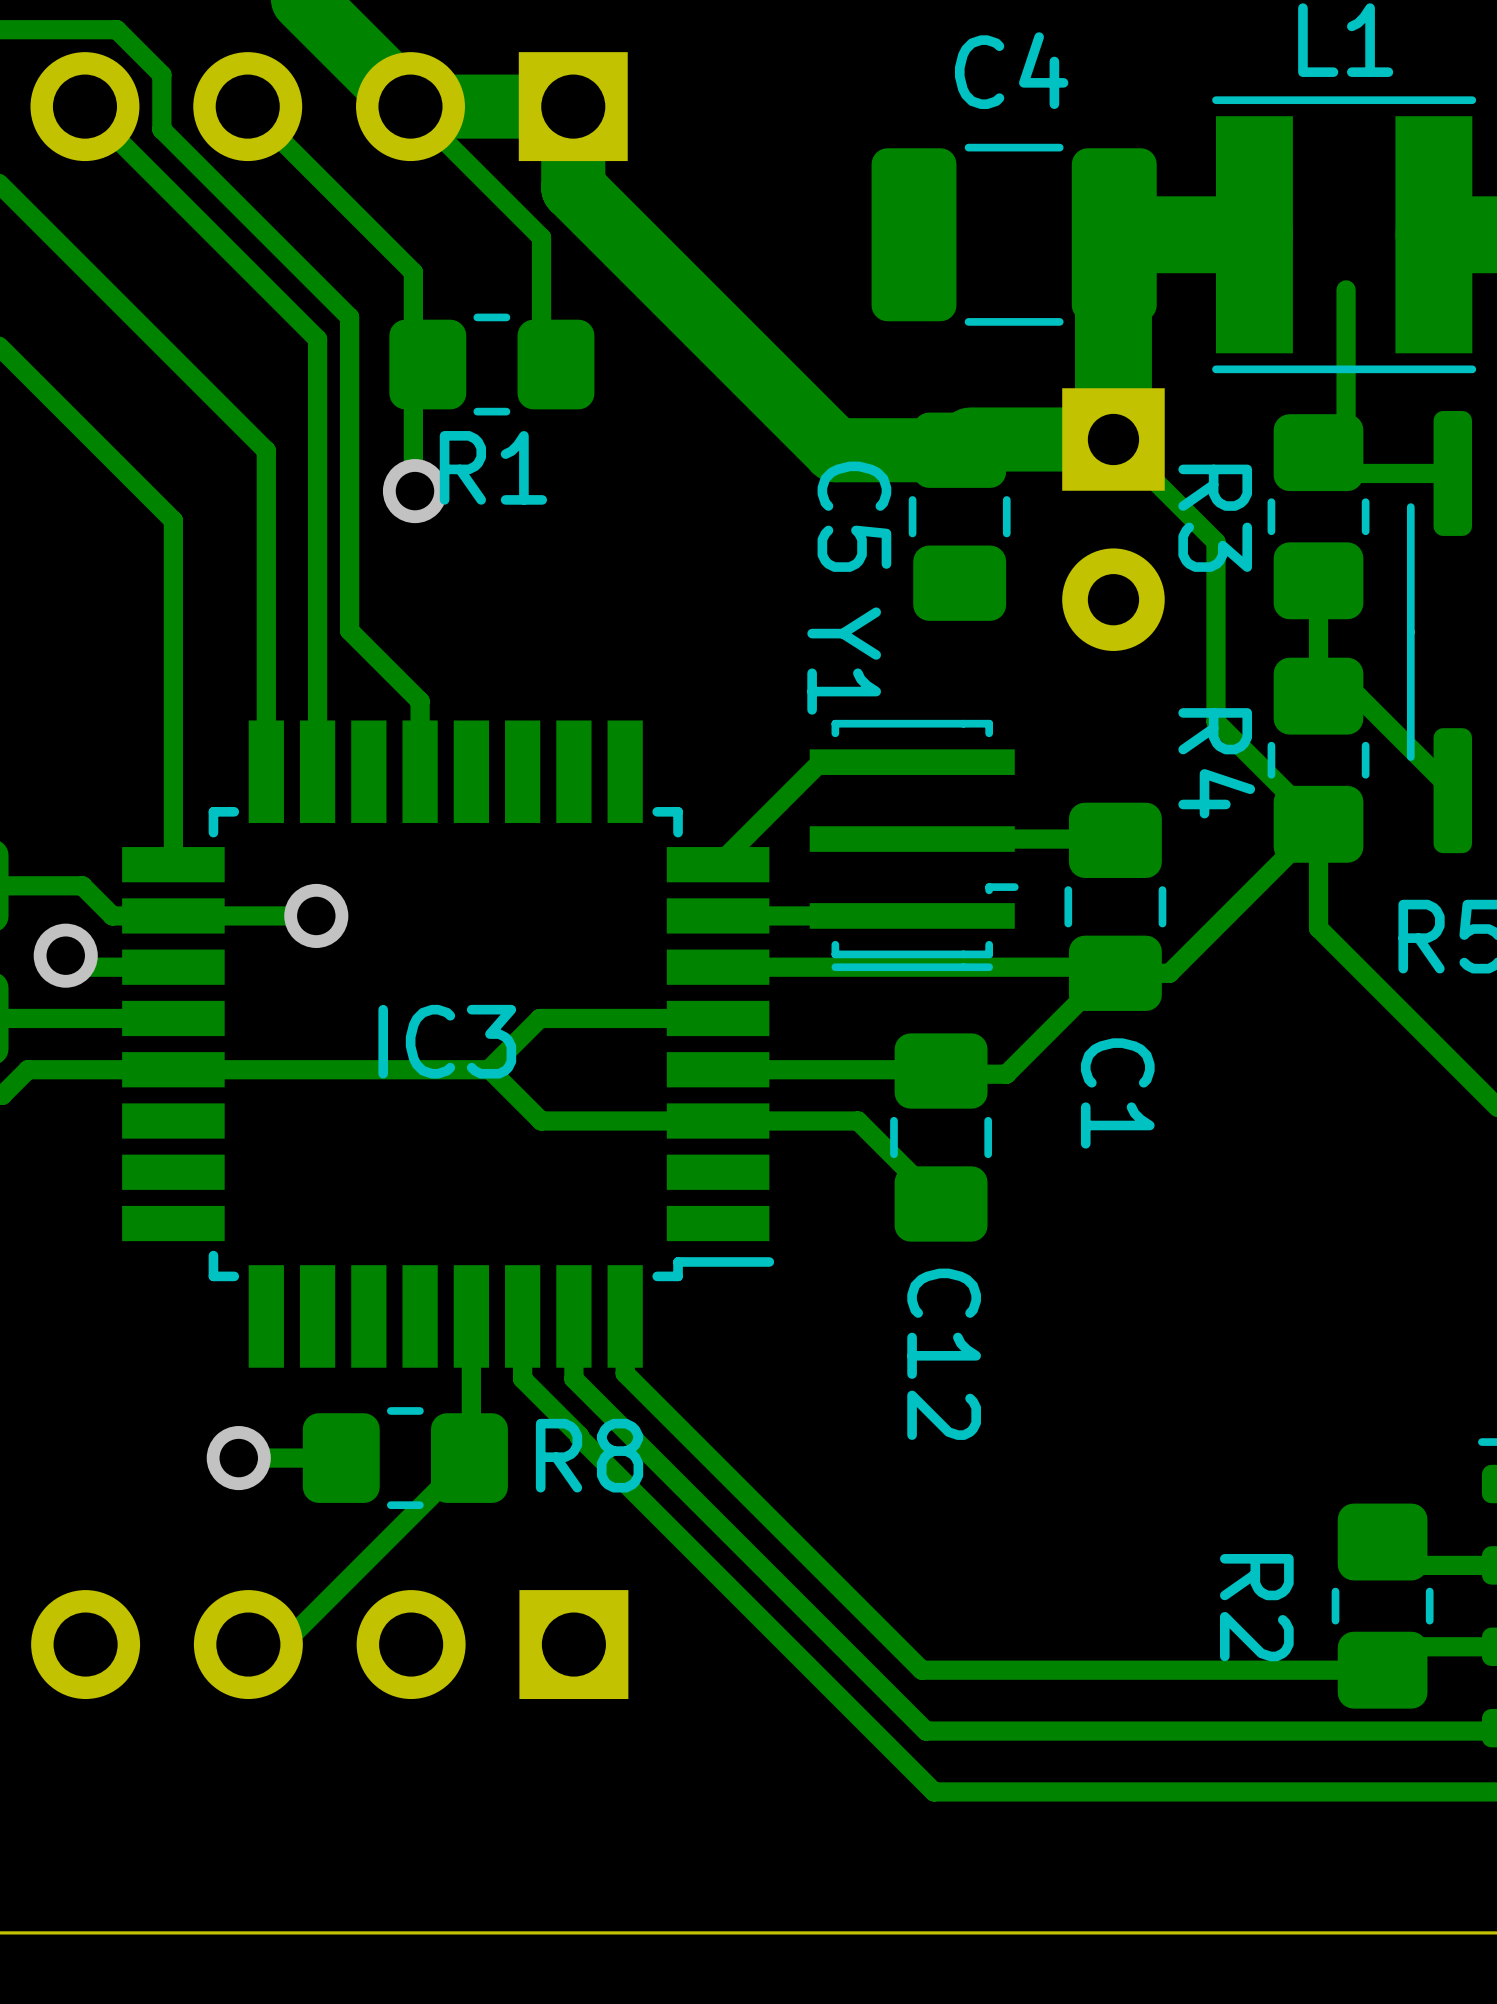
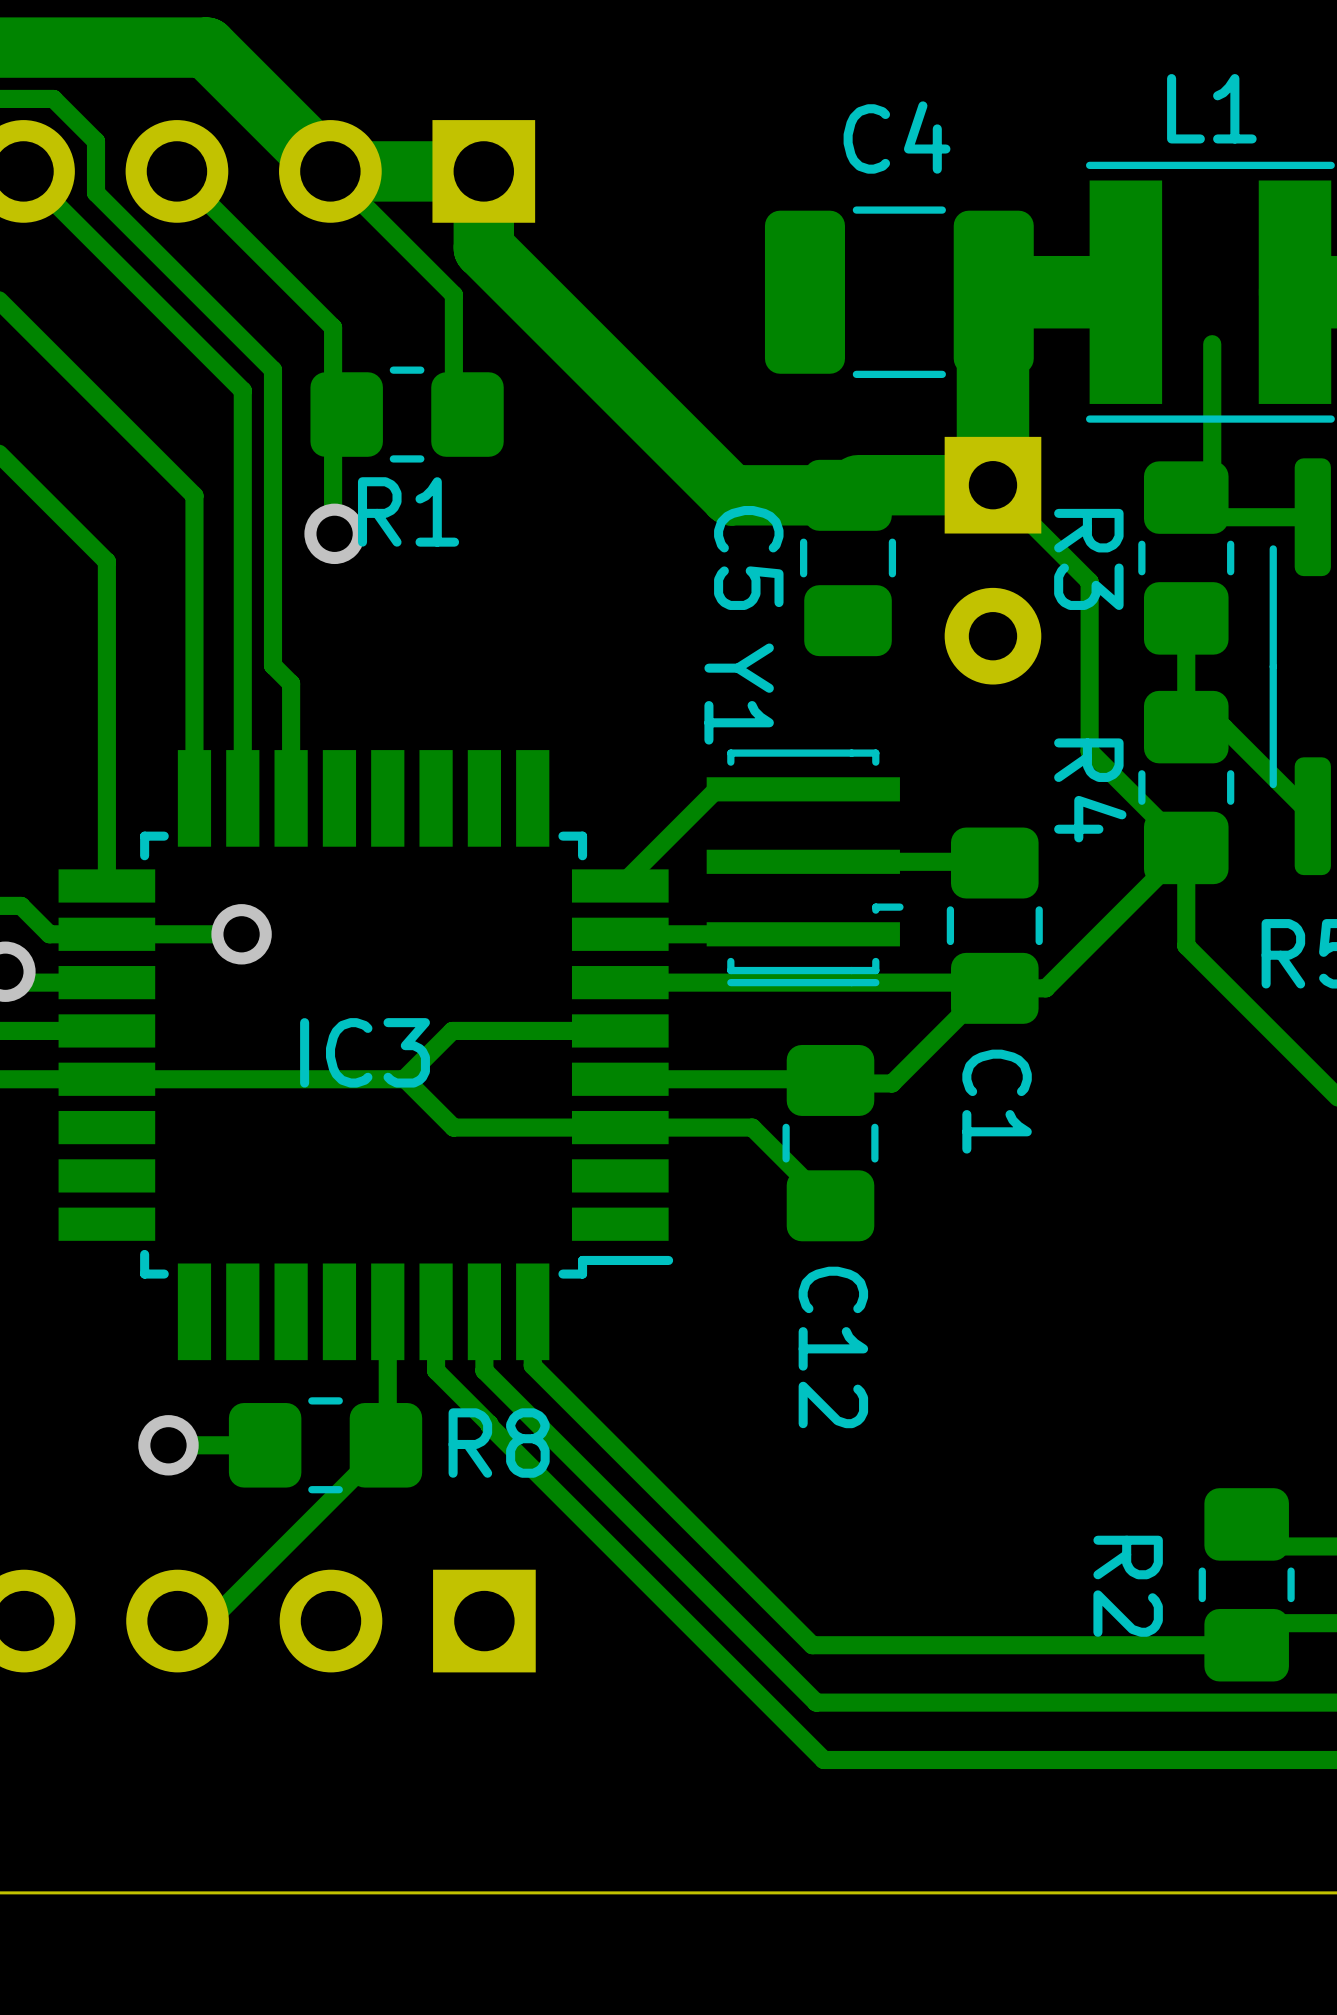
track: (368, 650) (420, 701) (420, 771) -> (291, 683) (291, 798)

